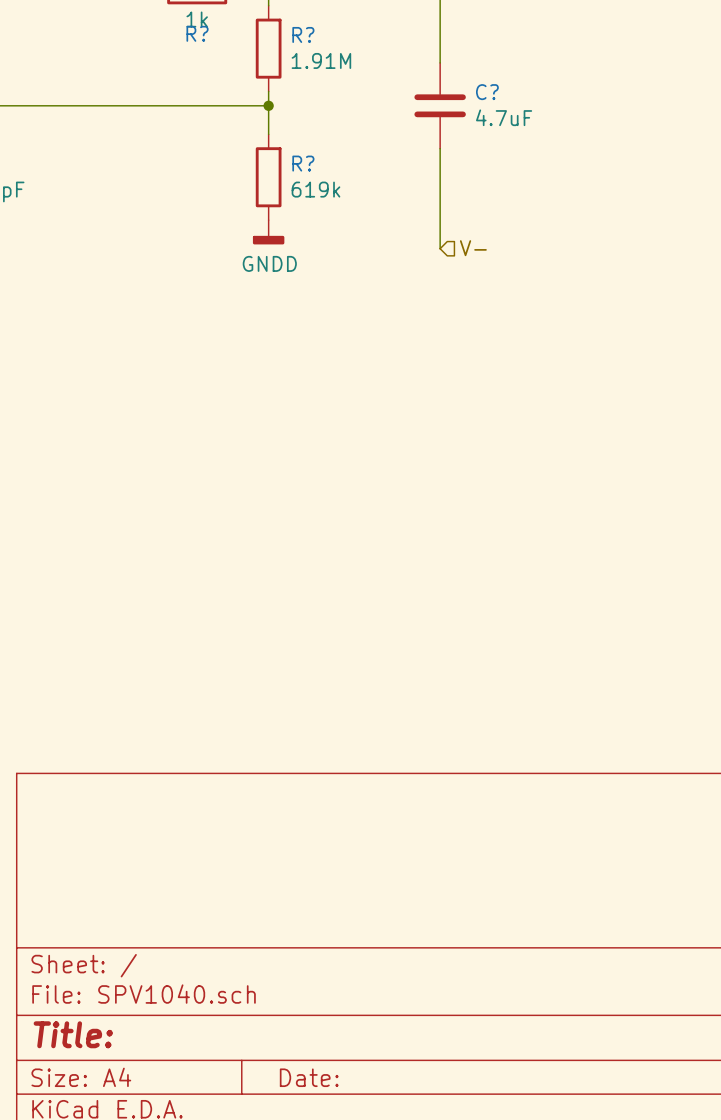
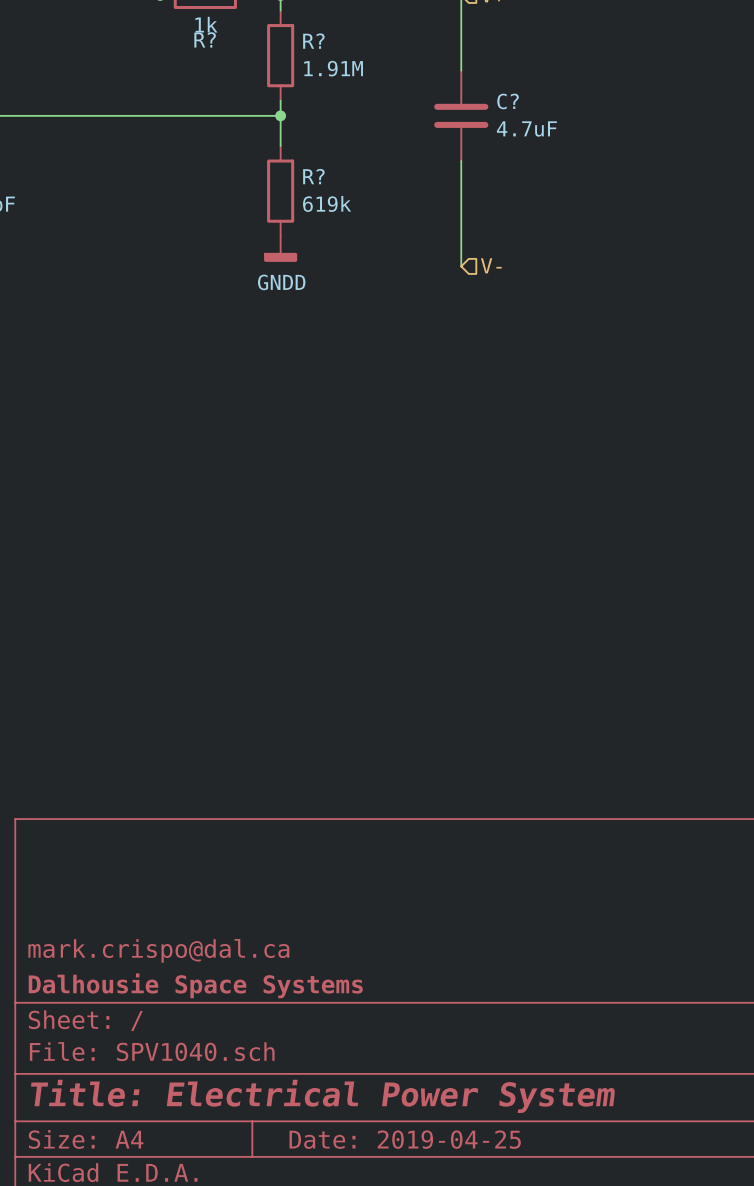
title block: none -> mark.crispo@dal.ca (158, 950)
title block: none -> Dalhousie Space Systems (195, 985)
title block: Title: (73, 1034) -> Title: Electrical Power System (323, 1096)
title block: Date: (309, 1077) -> Date: 2019-04-25 (405, 1139)

